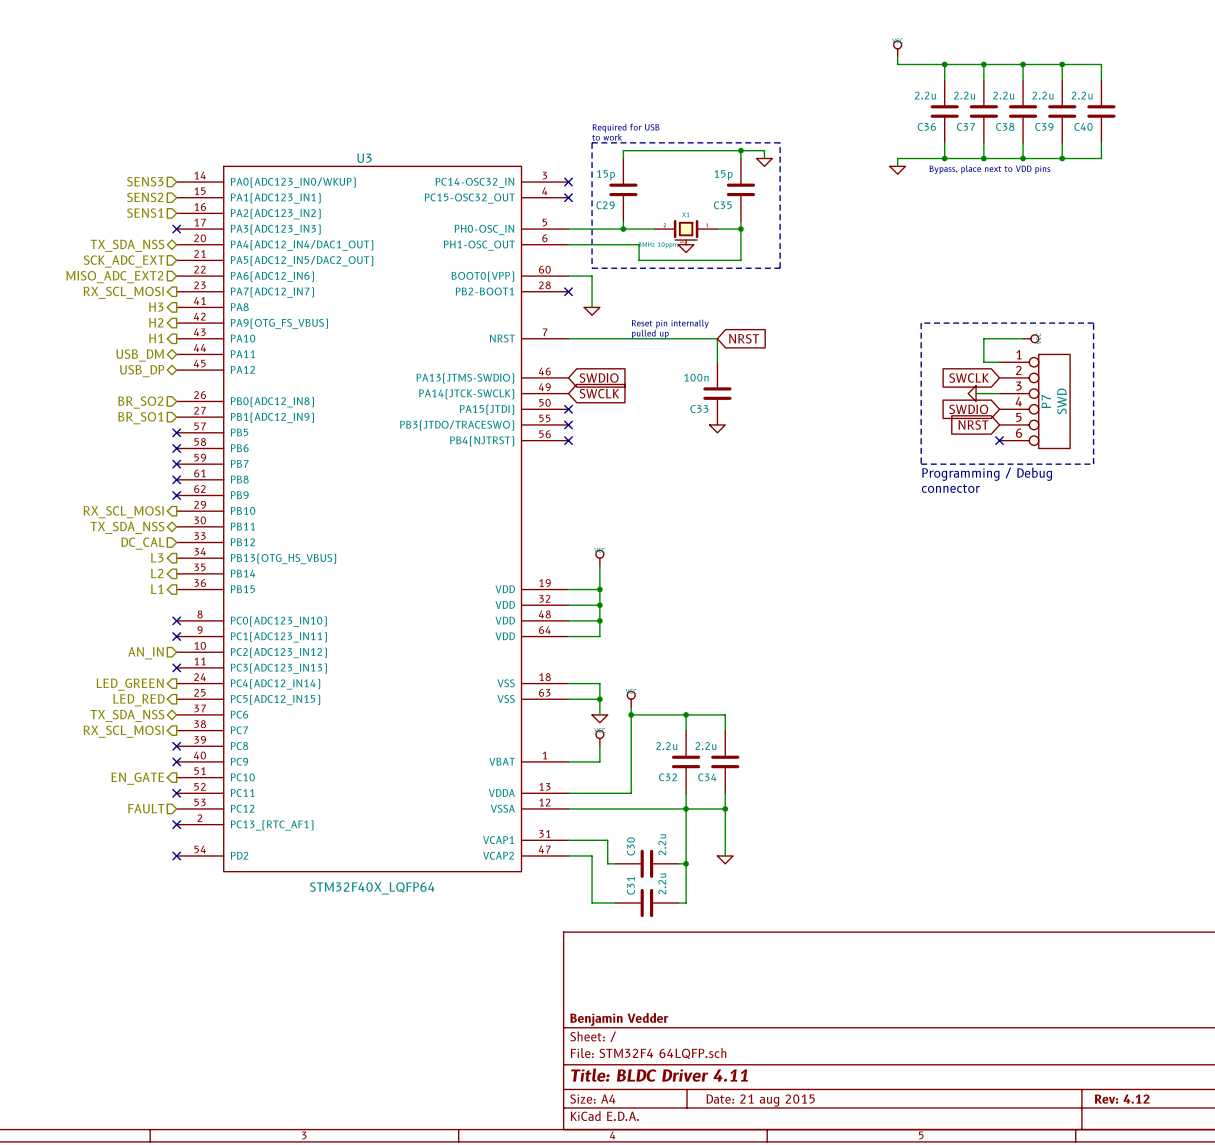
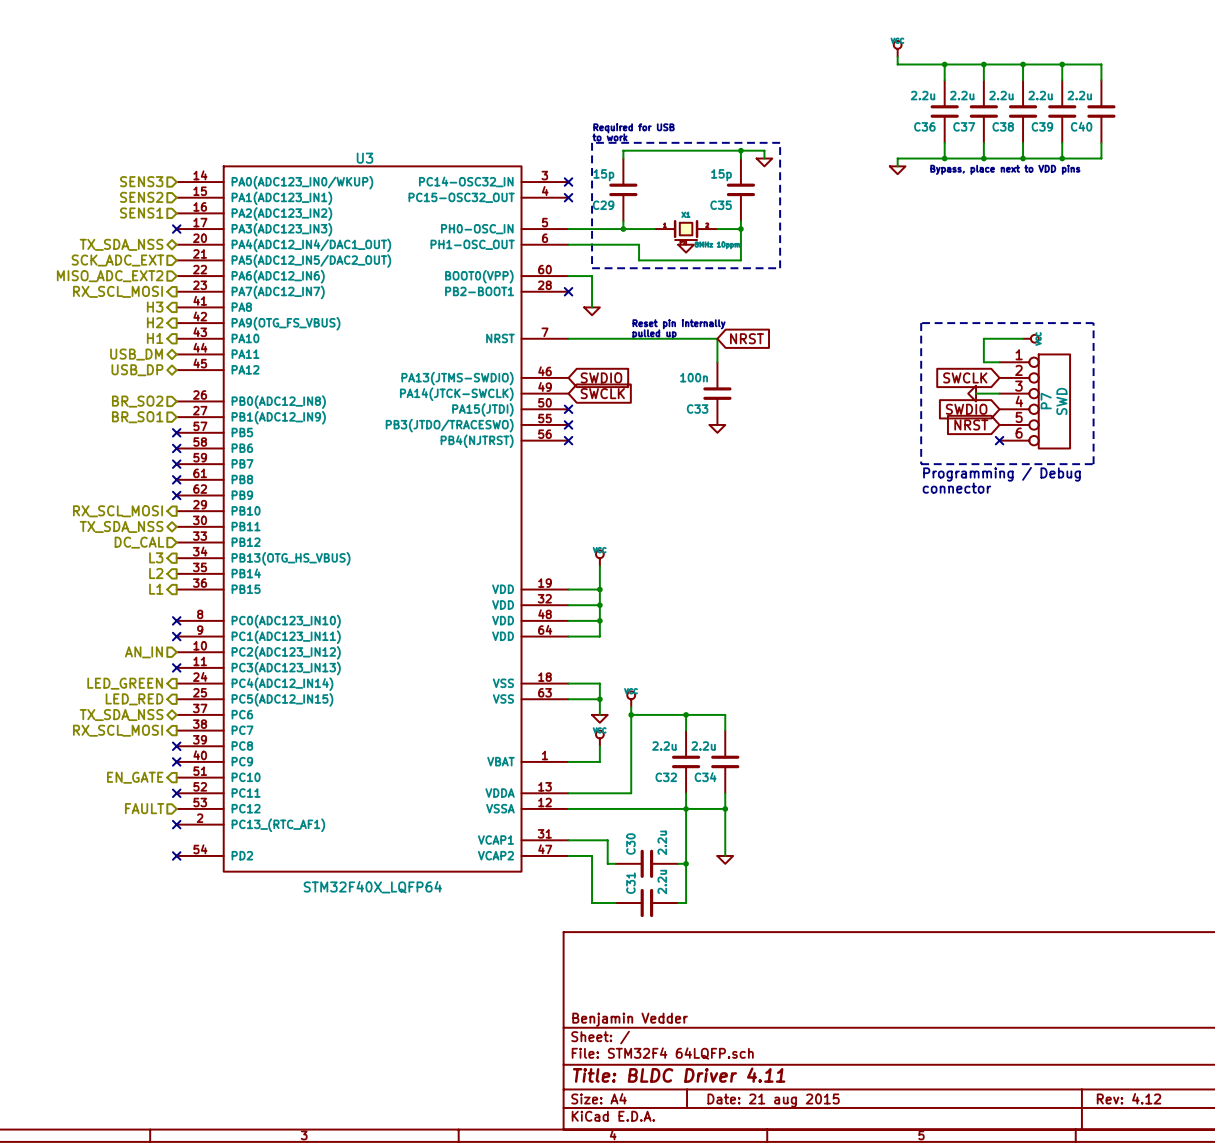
part flip: as is (686, 229) -> left-right (686, 229)

